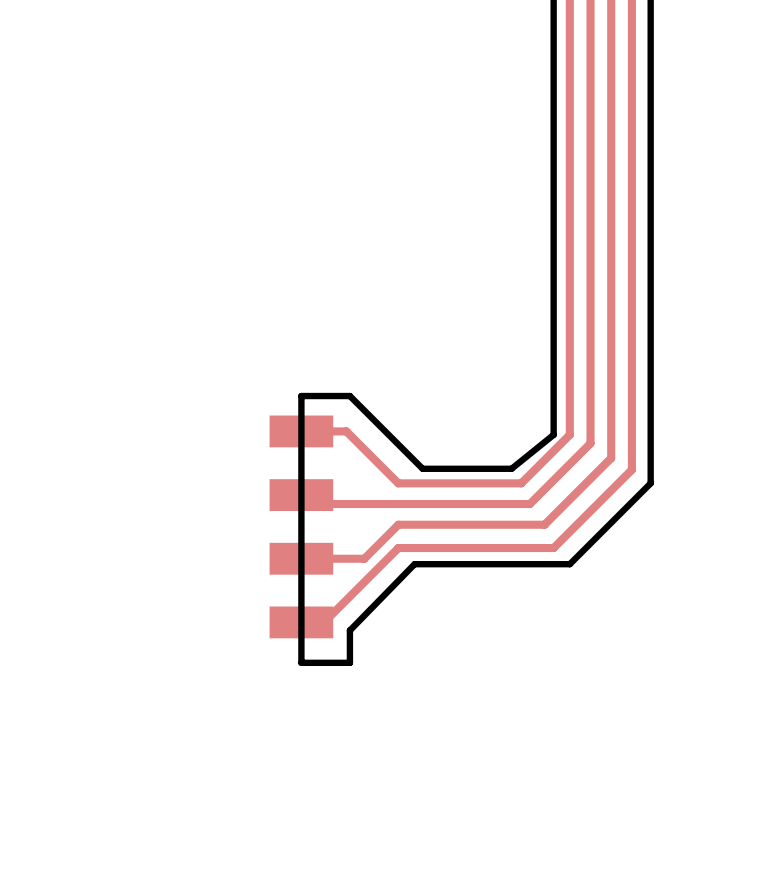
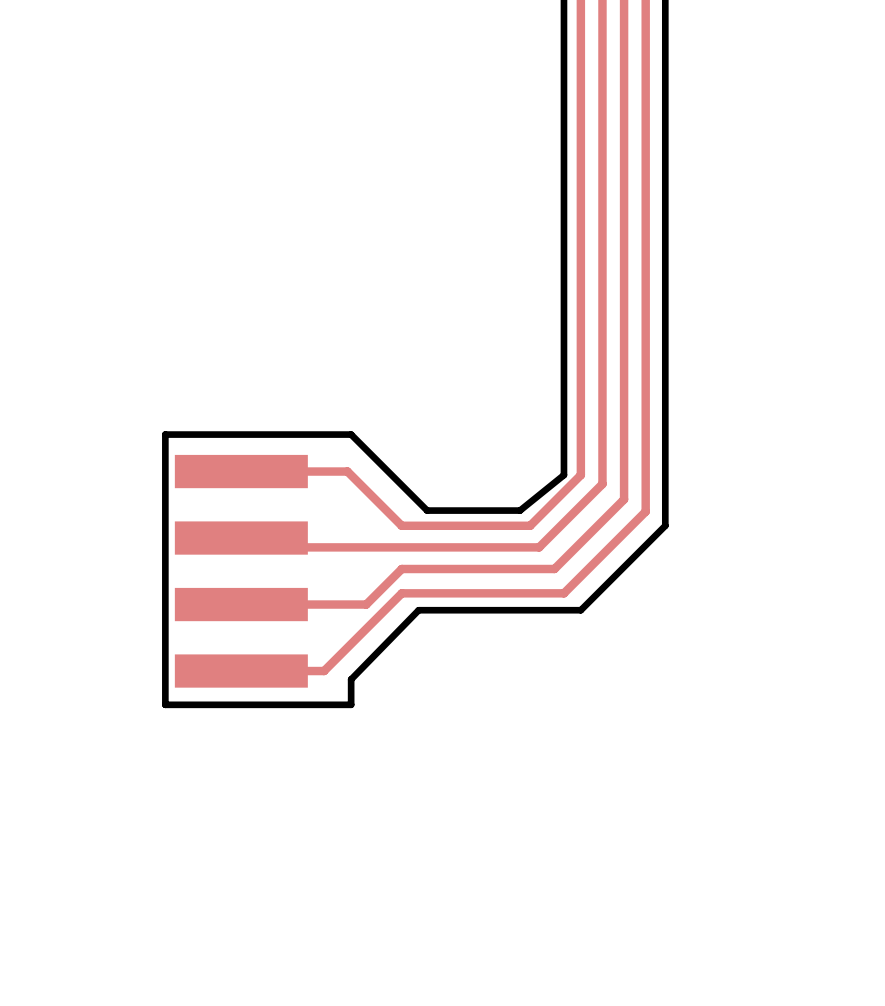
board edge: (301, 396) (301, 662) (349, 662) (349, 654) -> (300, 434) (165, 434) (165, 704) (351, 704)
part footprint: [269, 415, 334, 639] -> [174, 454, 308, 688]

